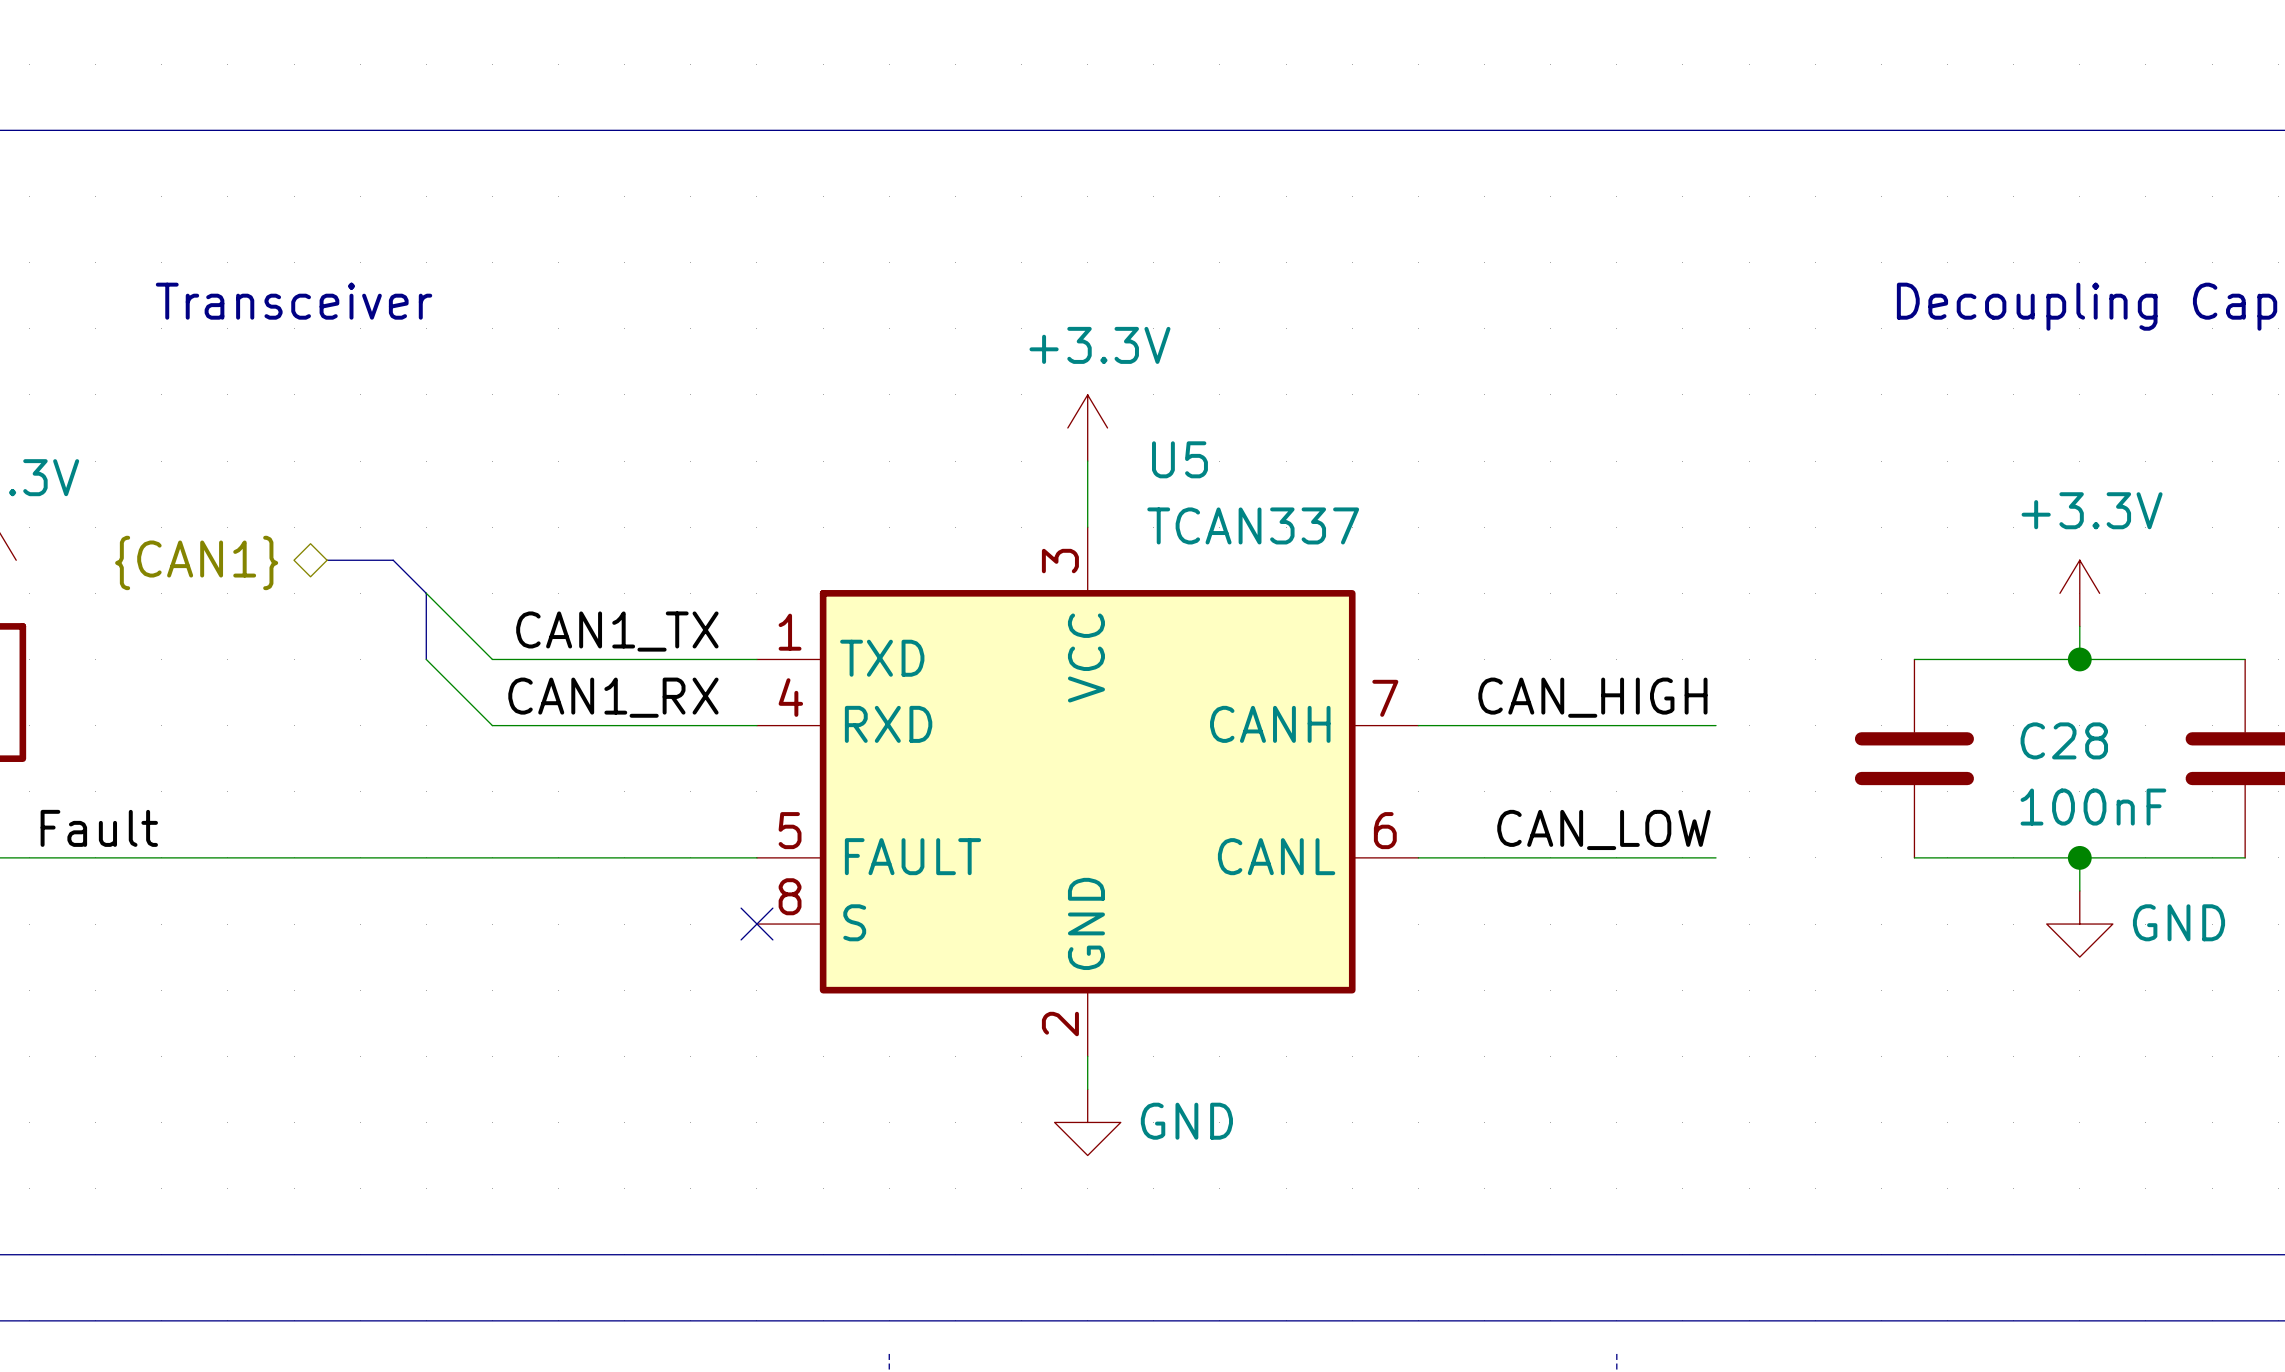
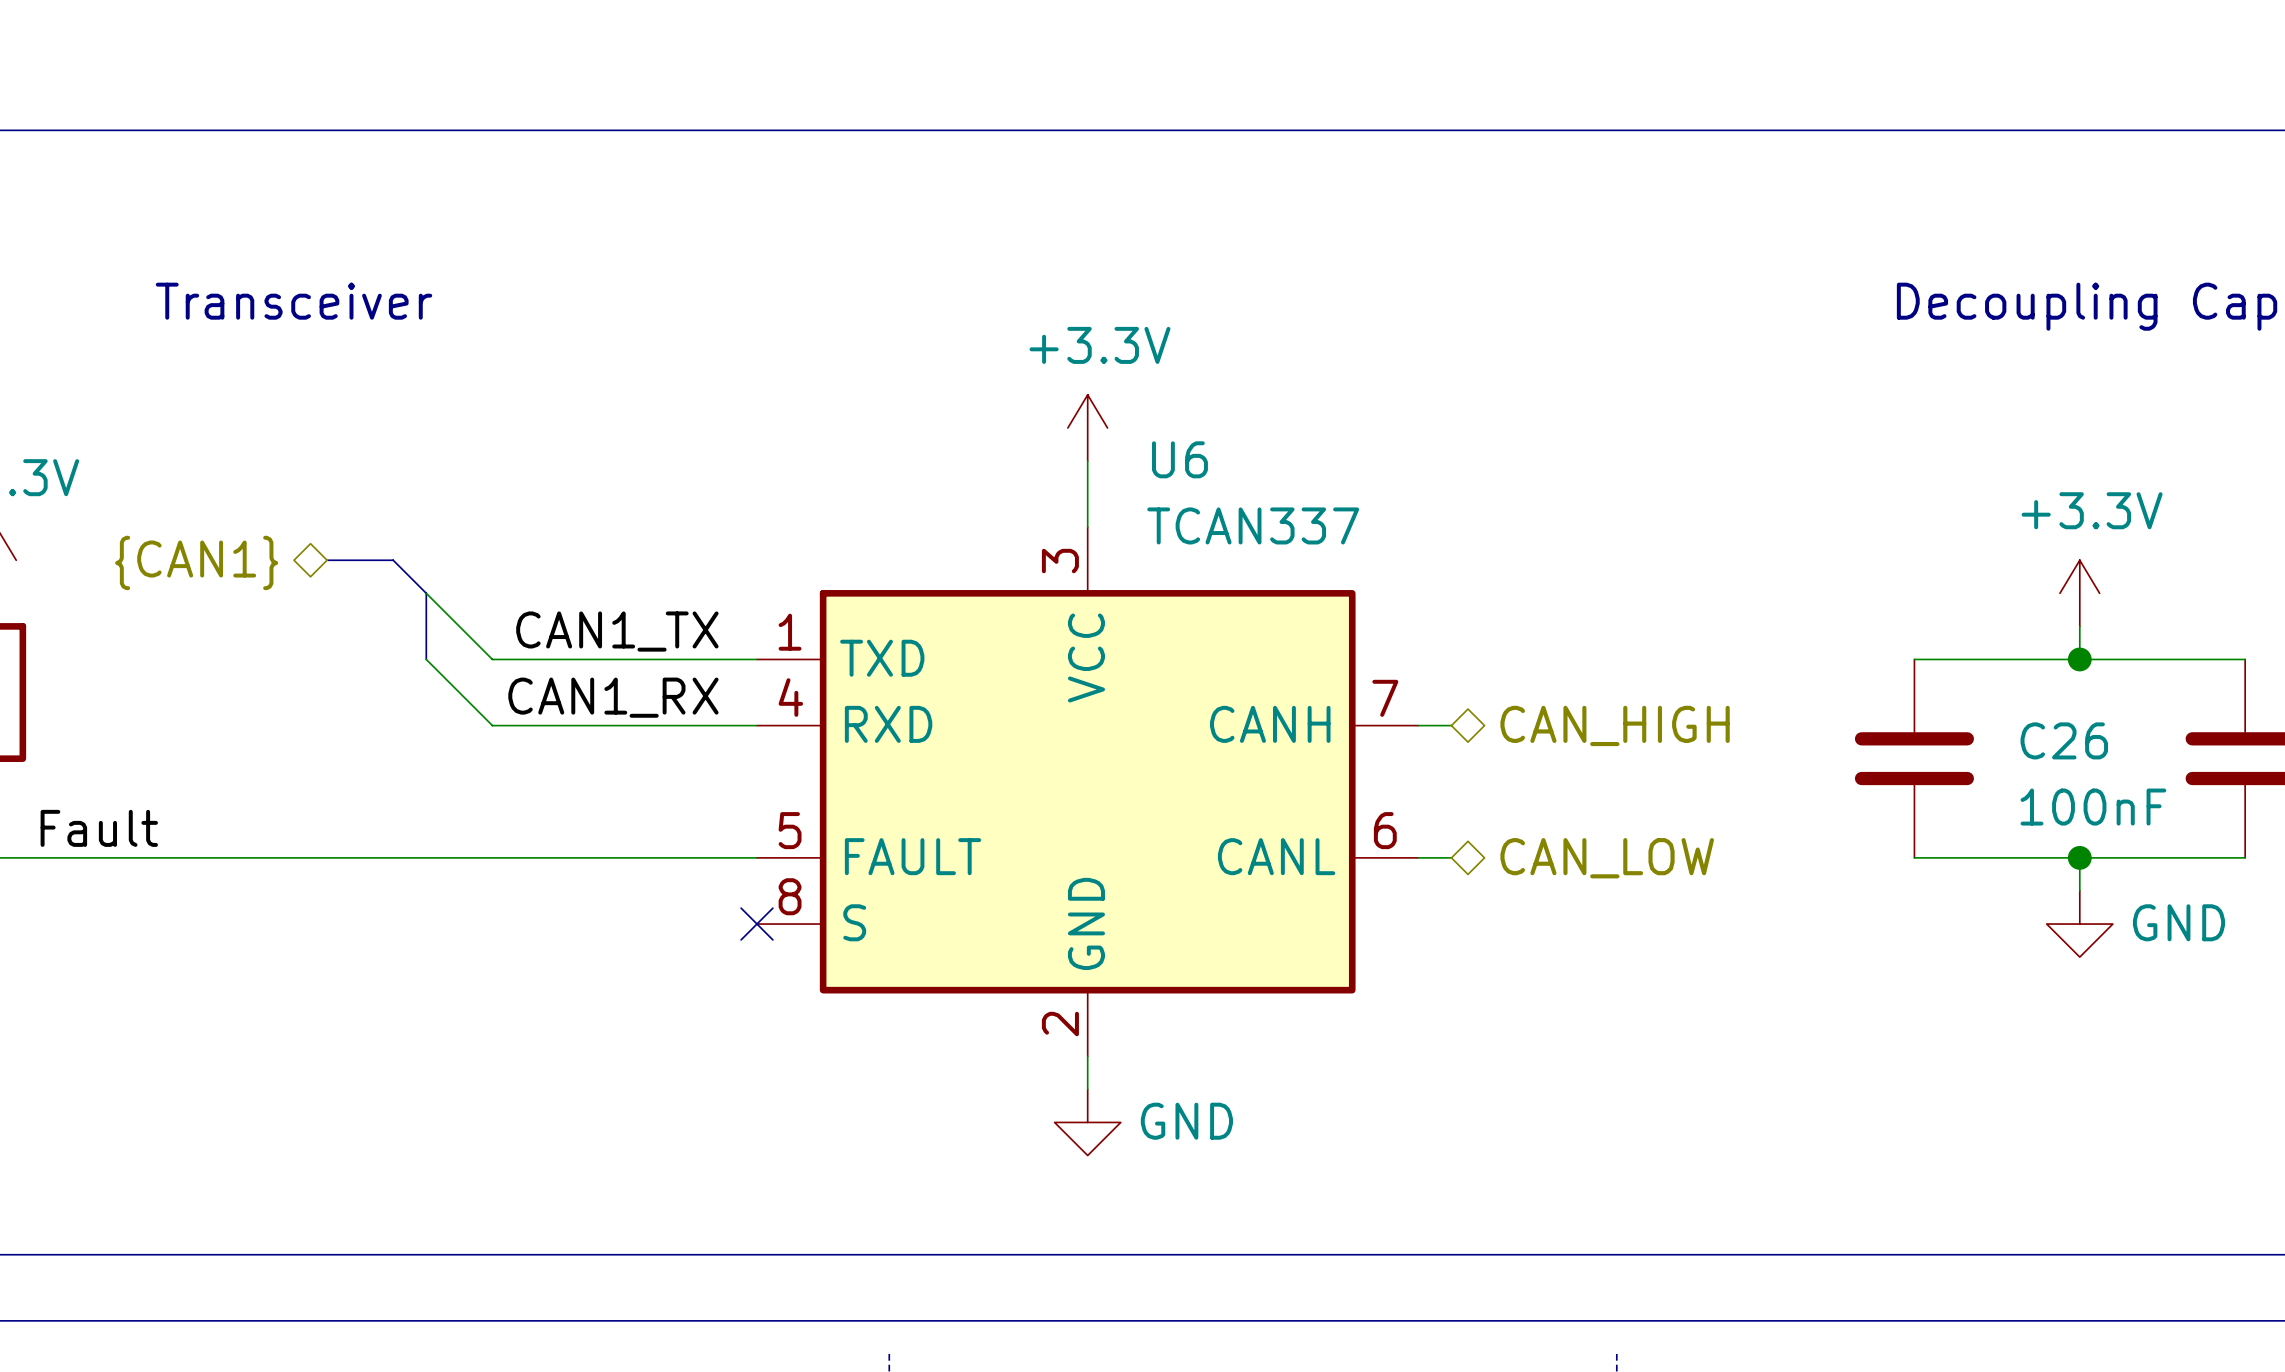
U5 name: U5 (1179, 459) -> U6 (1179, 459)
label: CAN_HIGH (1592, 697) -> none
wire: (1451, 725) (1716, 725) -> none
hierarchical label: none -> CAN_HIGH (1615, 725)
C28 name: C28 (2064, 740) -> C26 (2064, 740)
label: CAN_LOW (1603, 829) -> none
wire: (1451, 857) (1716, 857) -> none
hierarchical label: none -> CAN_LOW (1607, 858)

